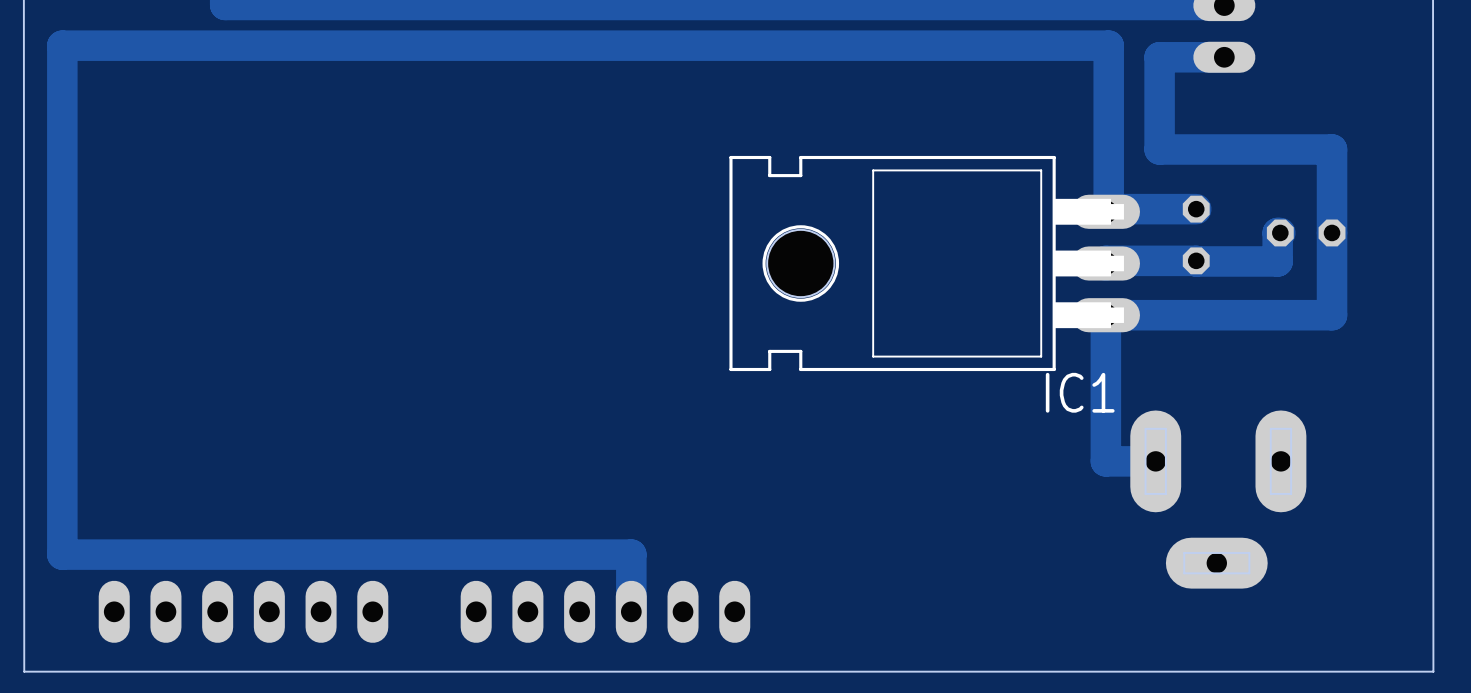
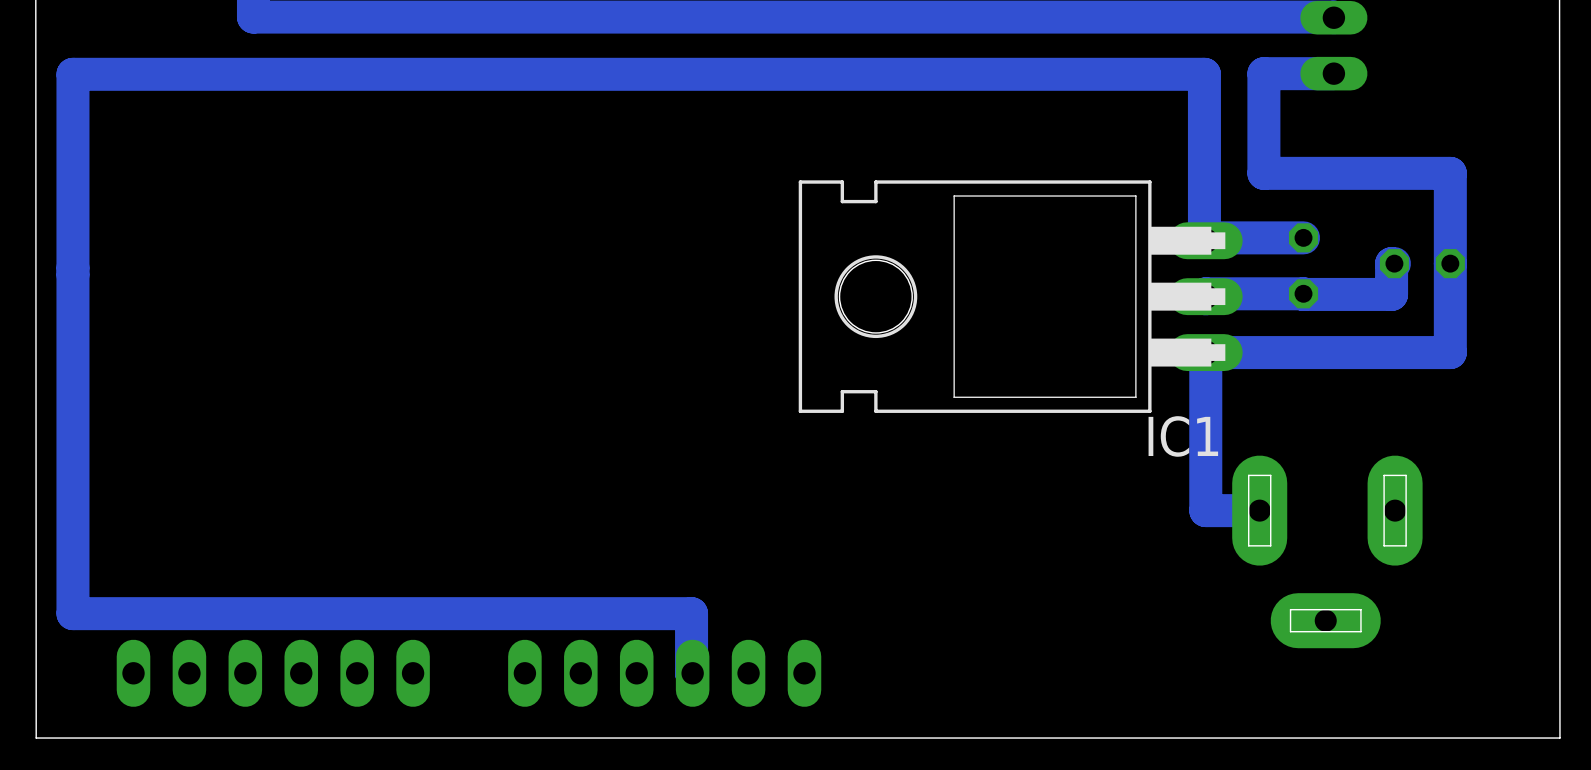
track: (1108, 211) (1108, 45) (62, 45) (62, 554) (631, 554) (631, 611) -> (1205, 240) (1204, 74) (72, 74) (72, 613) (691, 613) (692, 673)

